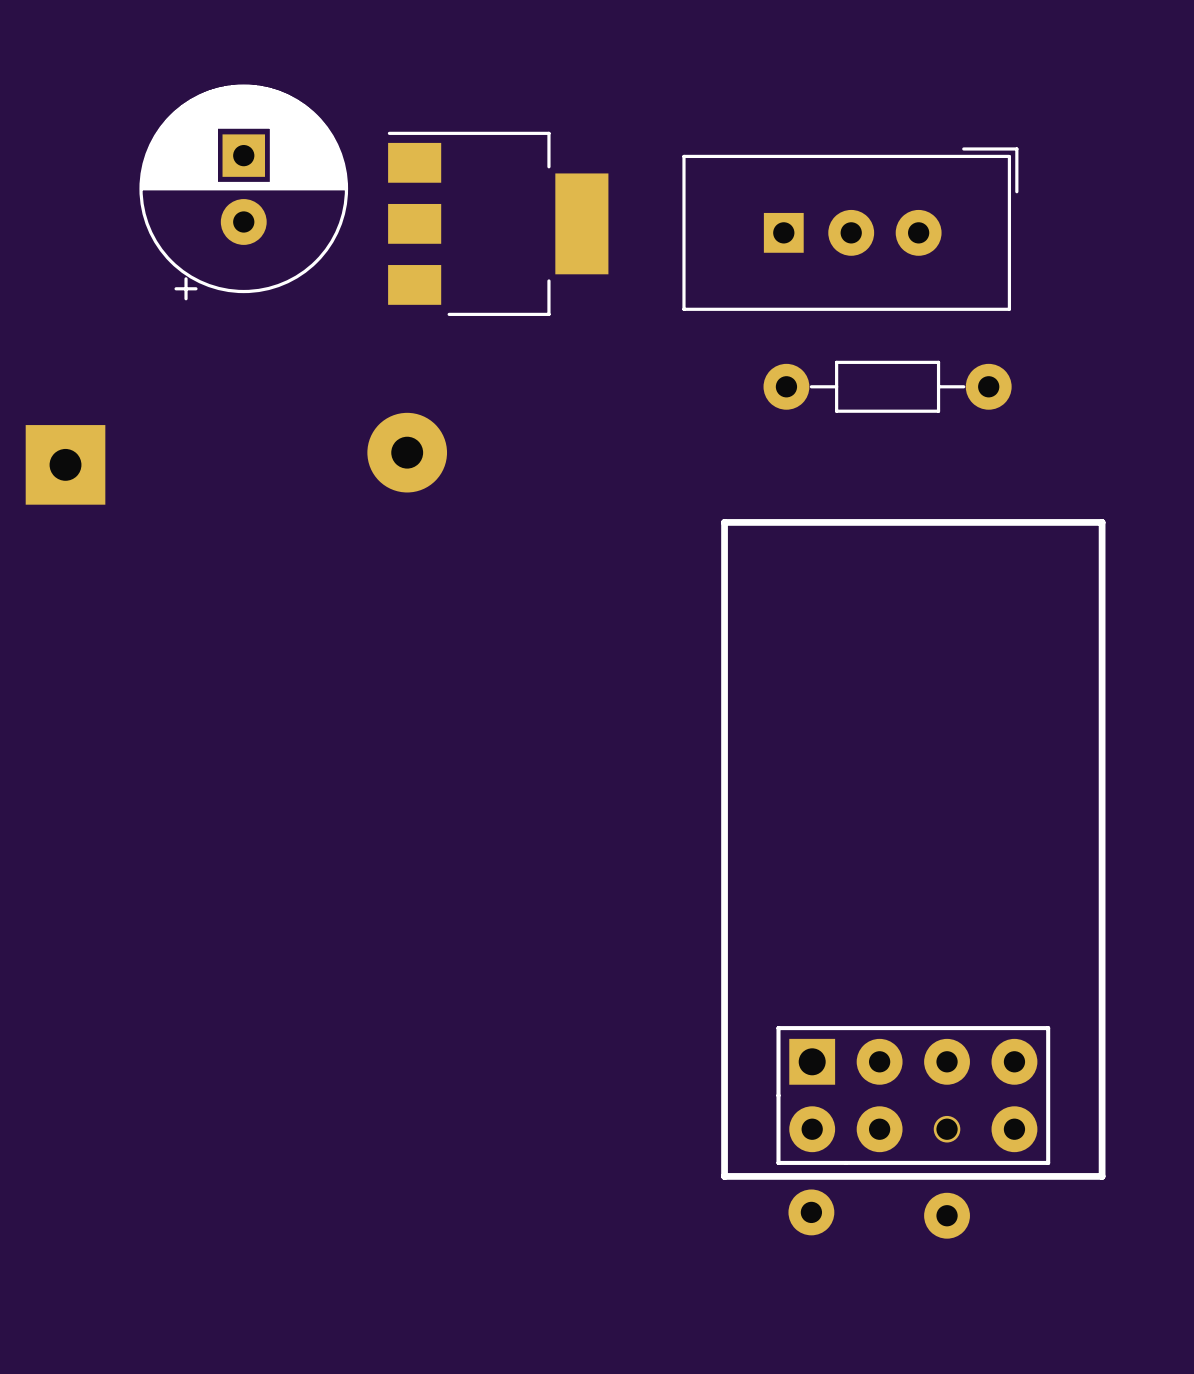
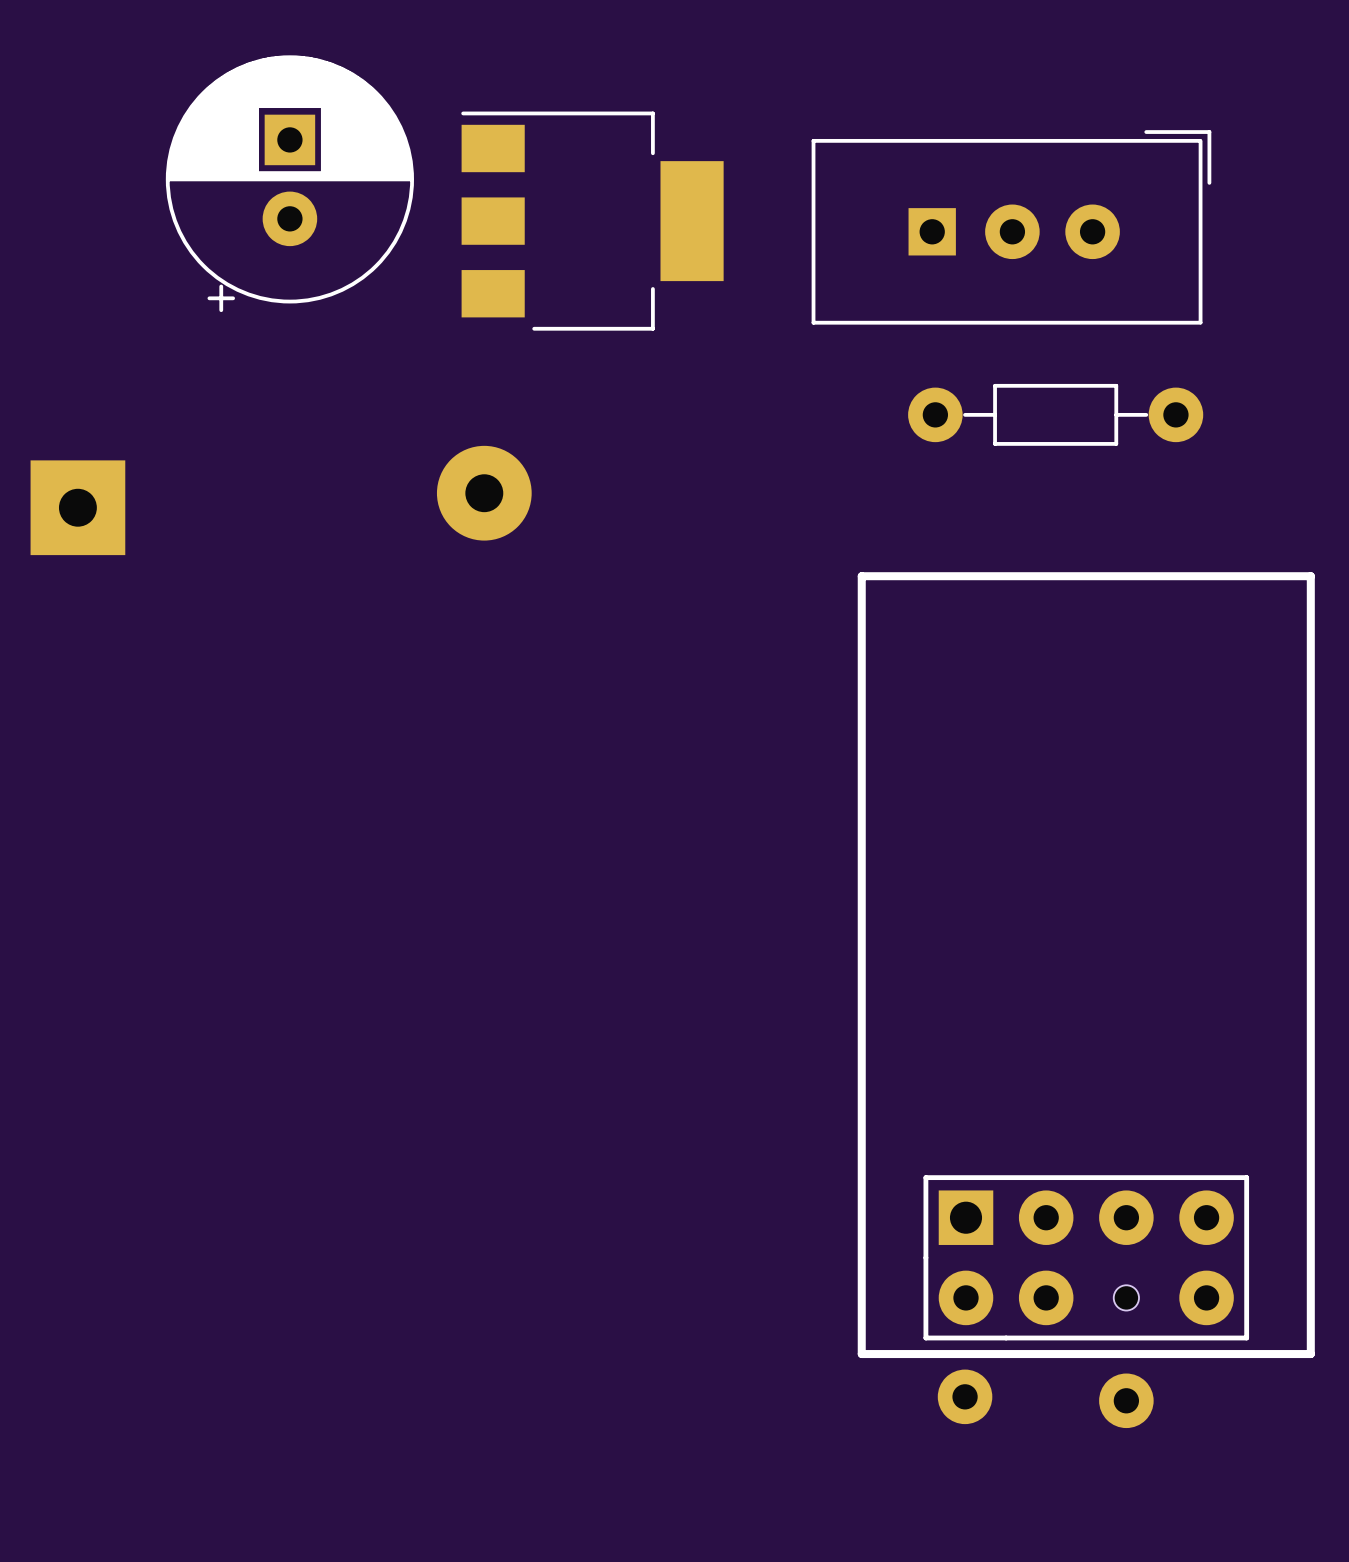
part footprint: [721, 519, 1106, 1180] -> [857, 572, 1315, 1359]

